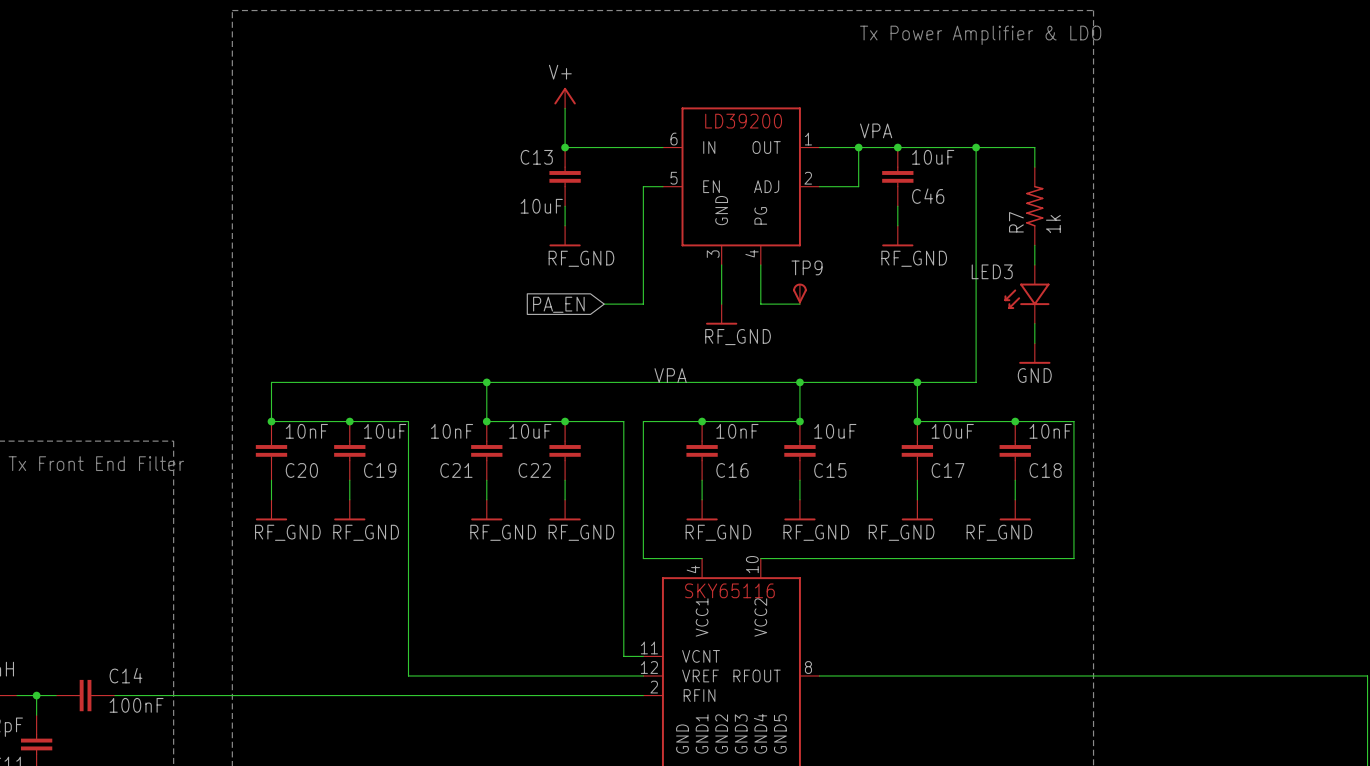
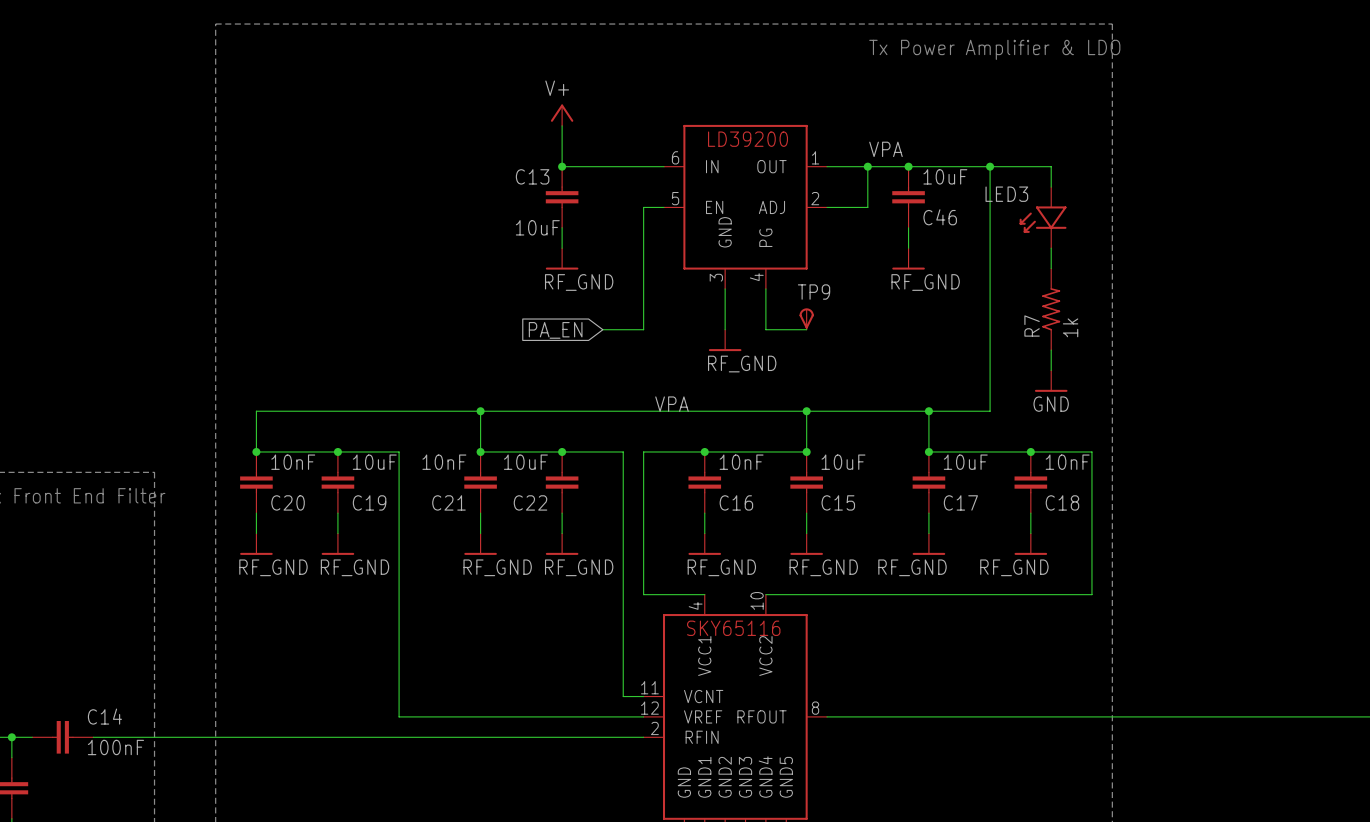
R7 position: (1034, 206) -> (1051, 309)
LED3 position: (1026, 294) -> (1043, 217)

